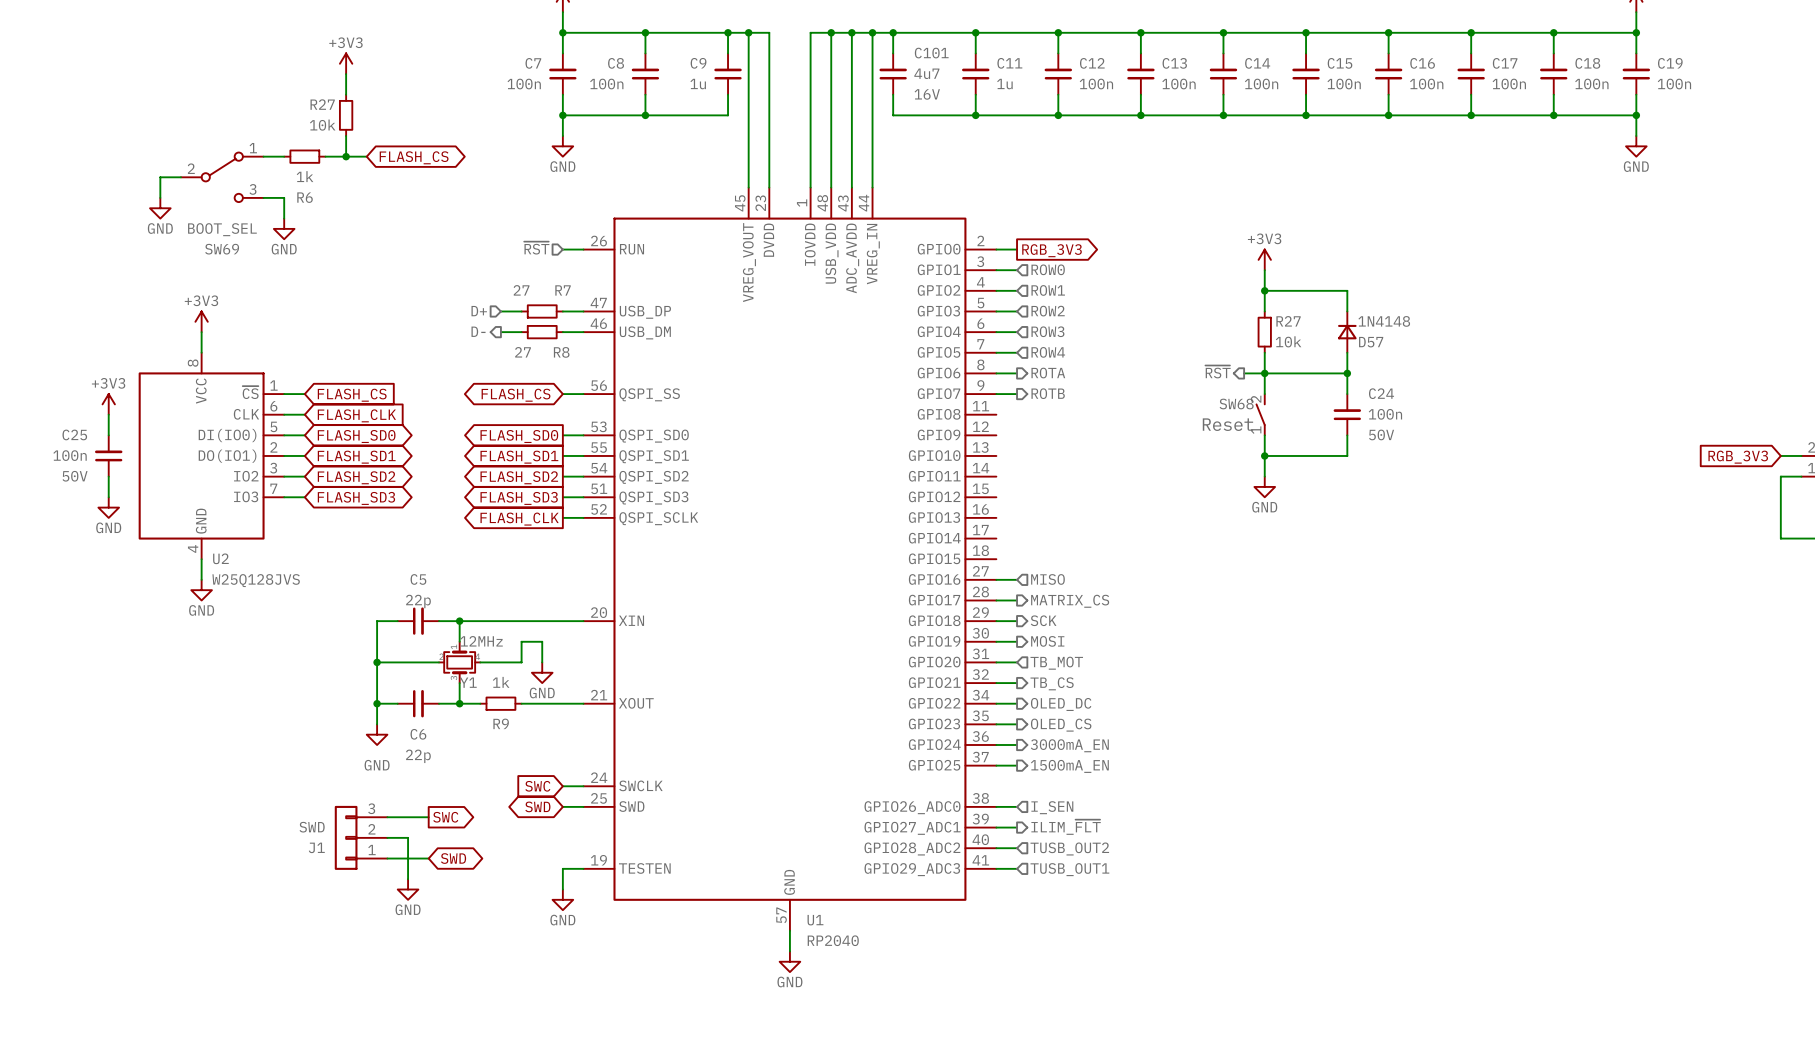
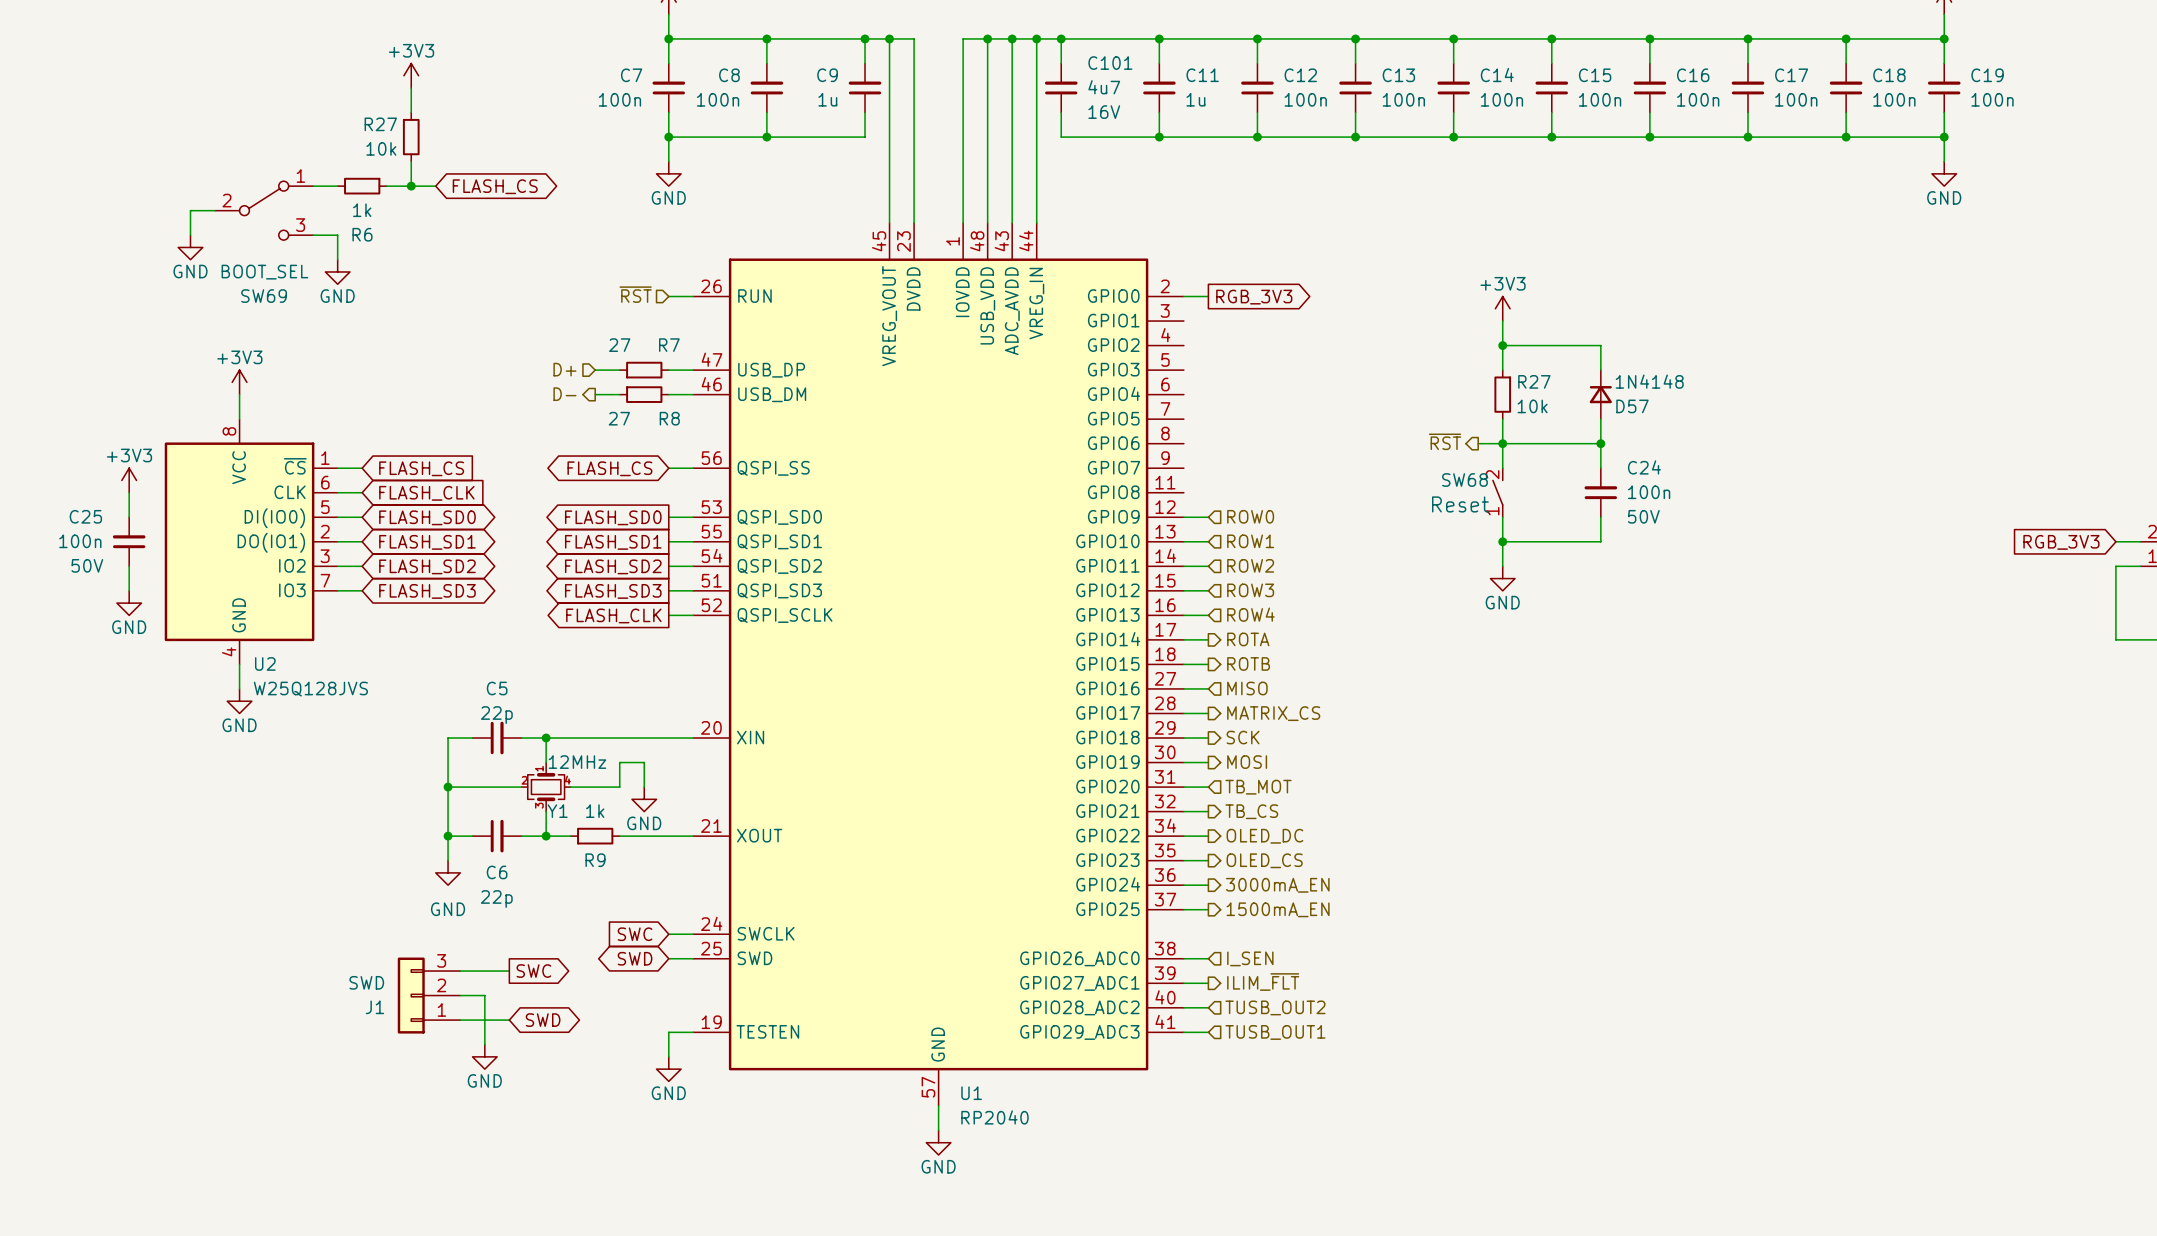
hierarchical label position: ROW0 (1048, 269) -> ROW0 (1250, 516)
wire: (996, 270) (1017, 270) -> (1183, 517) (1208, 517)
wire: (996, 290) (1017, 290) -> (1183, 541) (1208, 541)
hierarchical label position: ROW1 (1048, 290) -> ROW1 (1250, 541)
wire: (996, 311) (1017, 311) -> (1183, 566) (1208, 566)
hierarchical label position: ROW2 (1048, 311) -> ROW2 (1250, 565)
hierarchical label position: ROW3 (1047, 331) -> ROW3 (1250, 590)
wire: (996, 332) (1017, 332) -> (1183, 590) (1208, 590)
wire: (996, 352) (1017, 352) -> (1183, 615) (1208, 615)
hierarchical label position: ROW4 (1048, 352) -> ROW4 (1250, 614)
wire: (996, 373) (1017, 373) -> (1183, 639) (1208, 639)
hierarchical label position: ROTA (1048, 373) -> ROTA (1248, 639)
hierarchical label position: ROTB (1048, 393) -> ROTB (1248, 663)
wire: (996, 394) (1017, 394) -> (1183, 664) (1208, 664)

